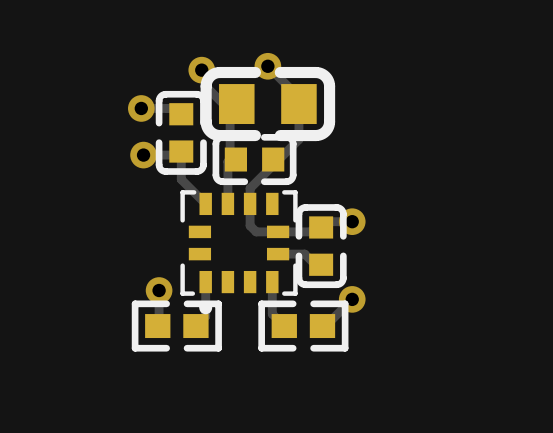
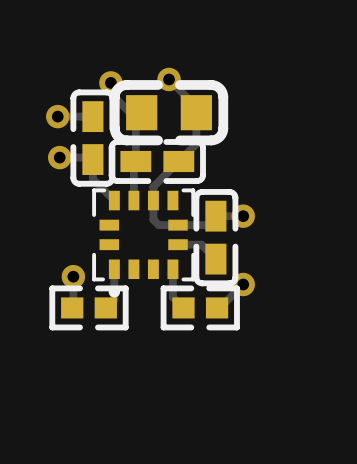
part footprint: [155, 90, 207, 175] -> [70, 89, 116, 187]
part footprint: [212, 133, 297, 186] -> [108, 139, 206, 184]
part footprint: [295, 204, 347, 289] -> [193, 189, 239, 287]

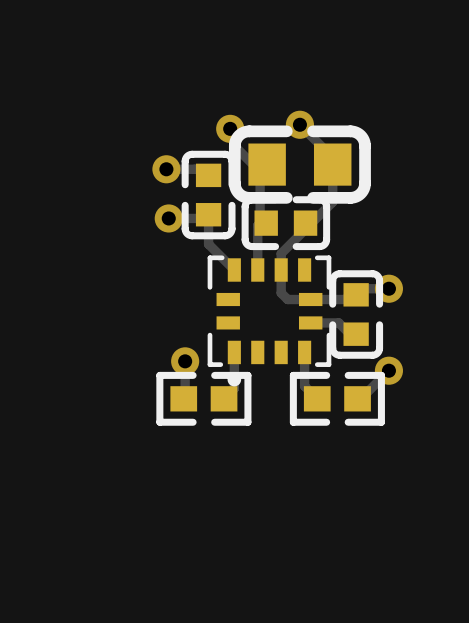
part footprint: [70, 89, 116, 187] -> [181, 150, 236, 240]
part footprint: [108, 139, 206, 184] -> [241, 196, 331, 251]
part footprint: [193, 189, 239, 287] -> [329, 270, 384, 359]

